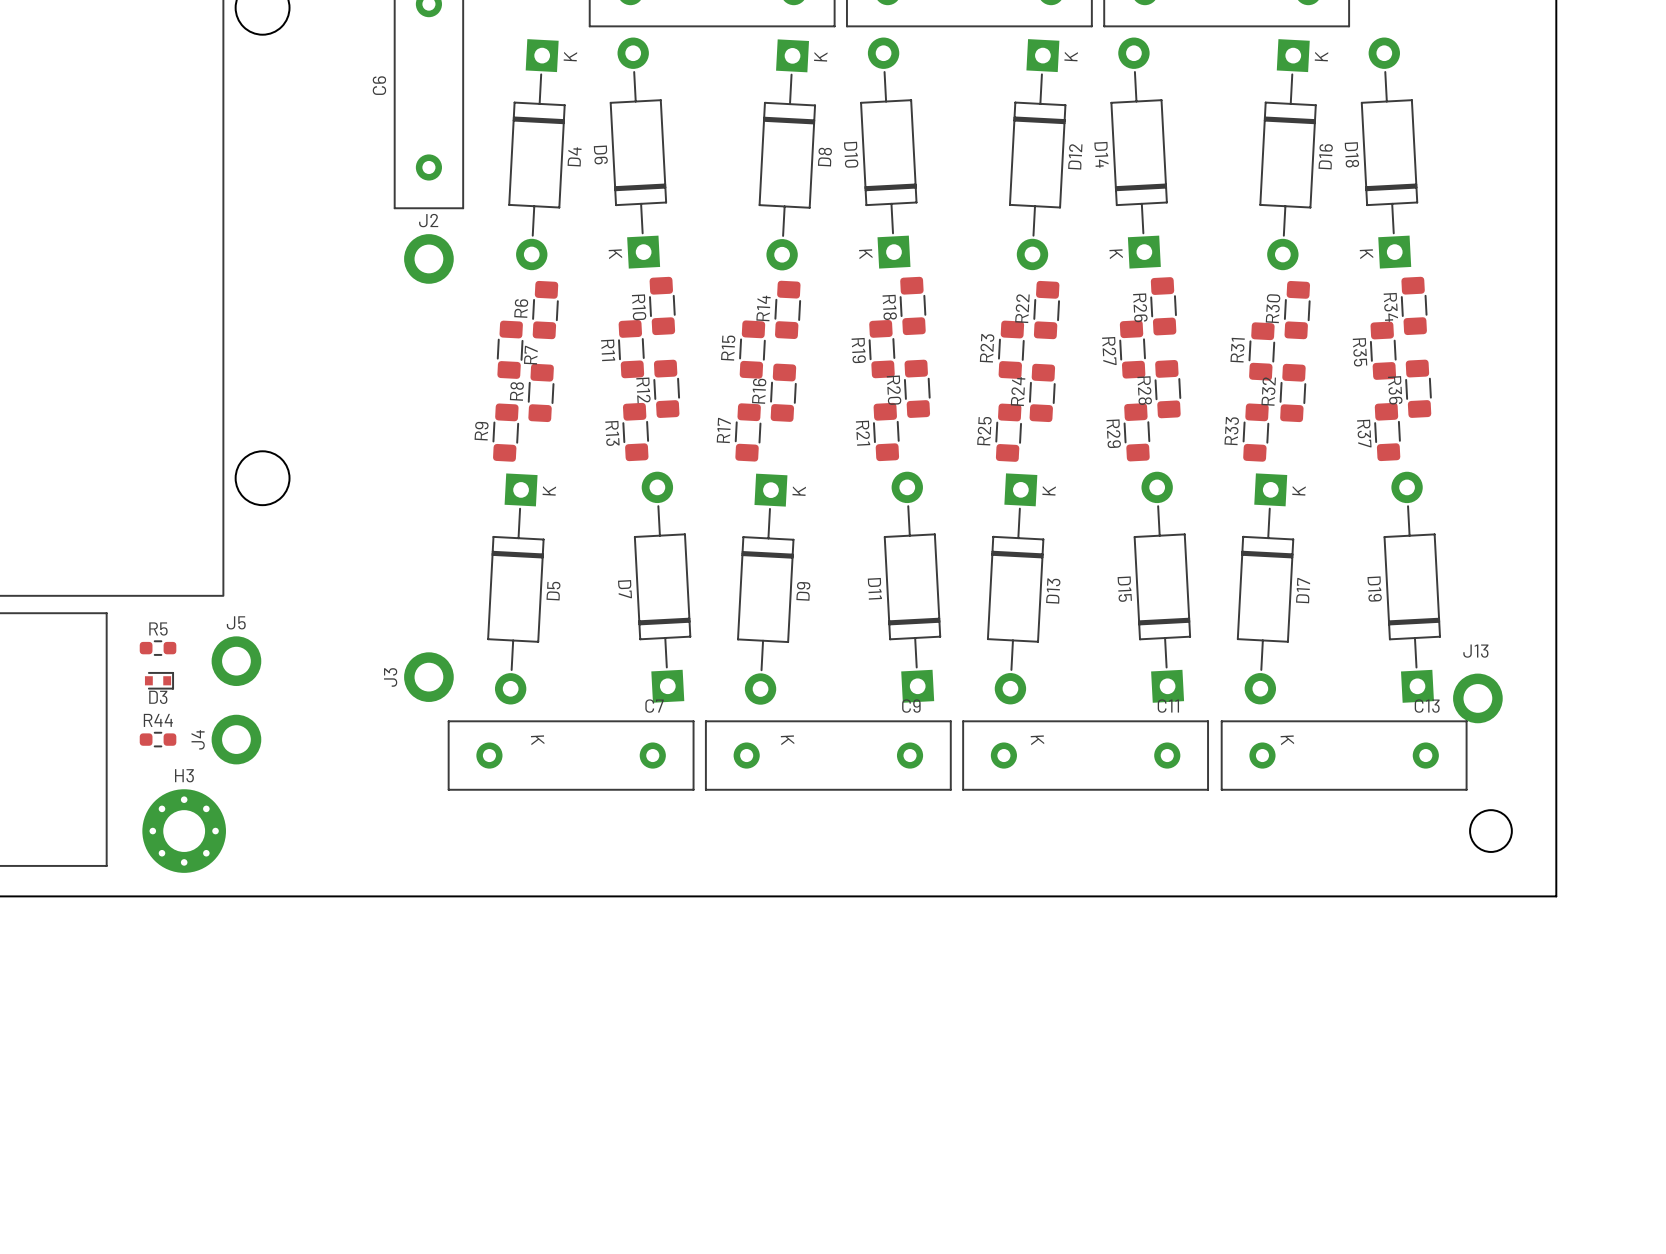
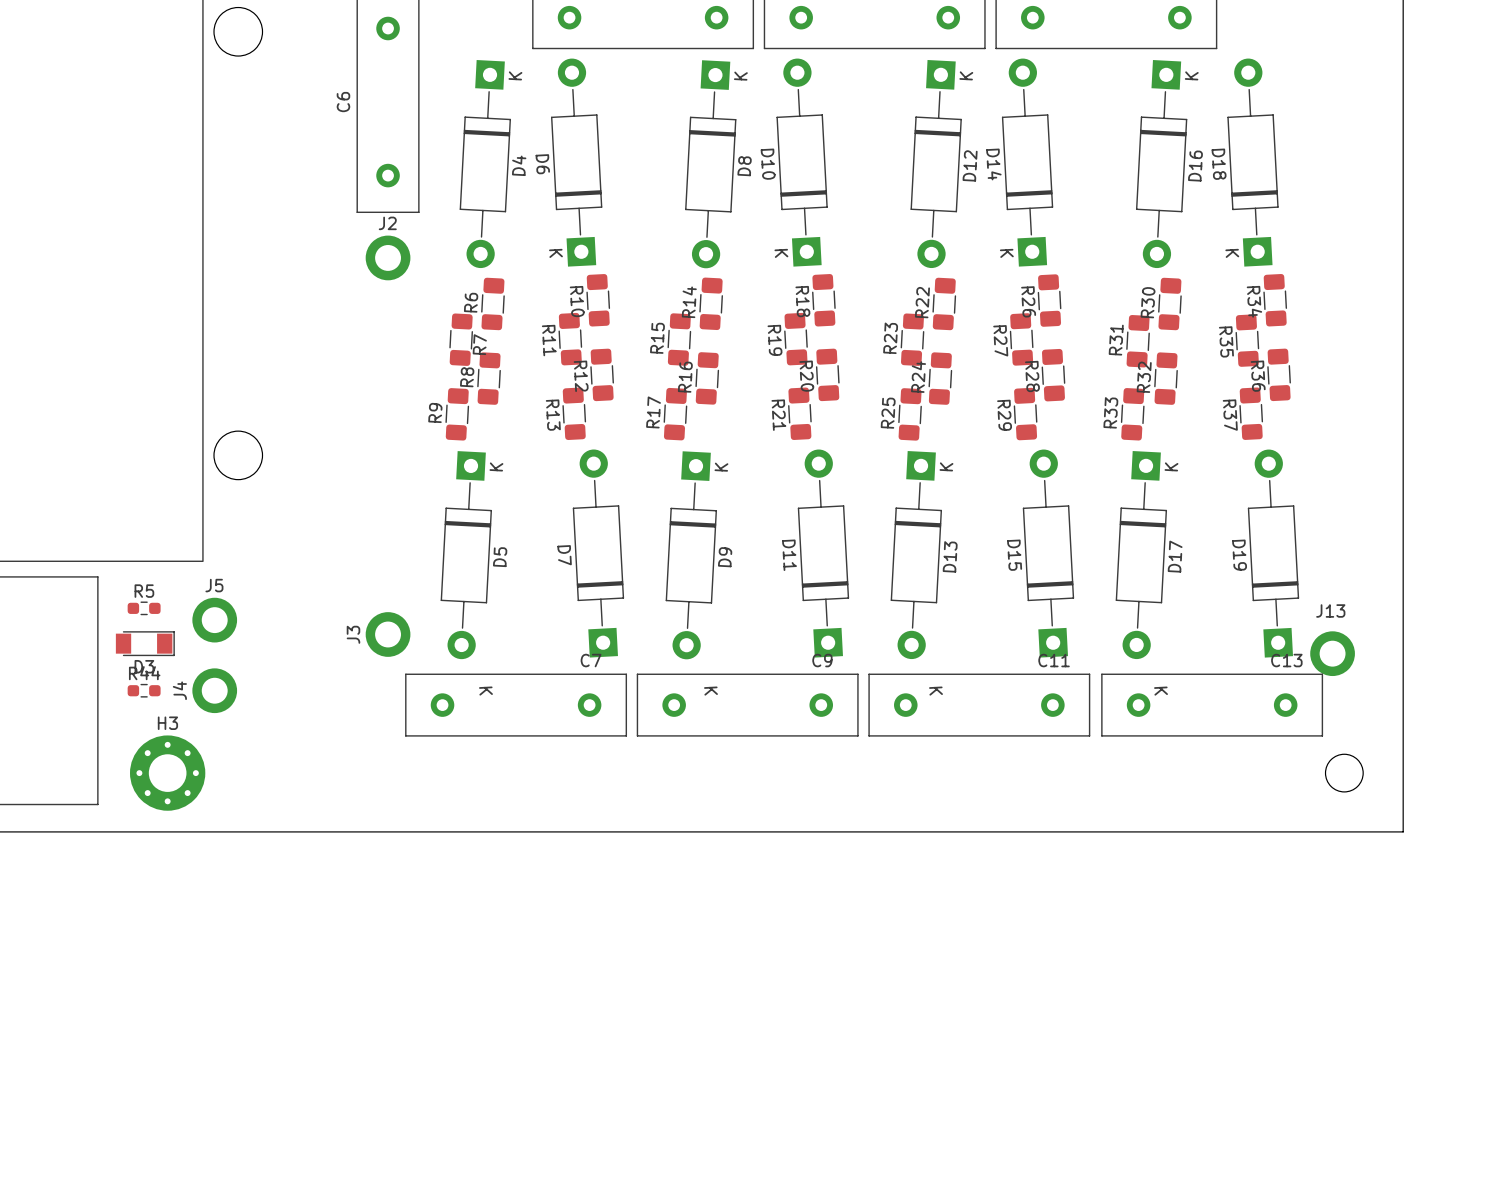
D3 footprint: [144, 672, 174, 690] -> [115, 631, 175, 657]

